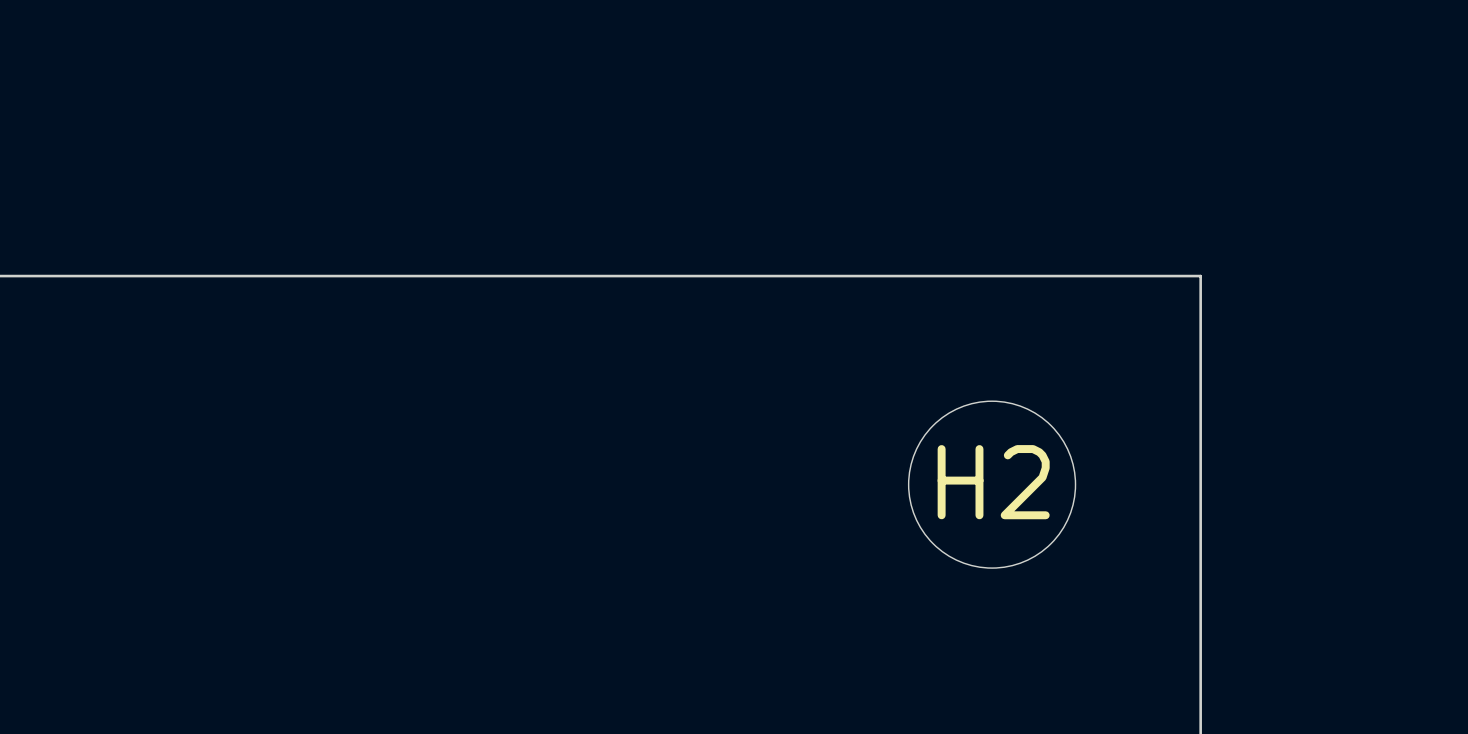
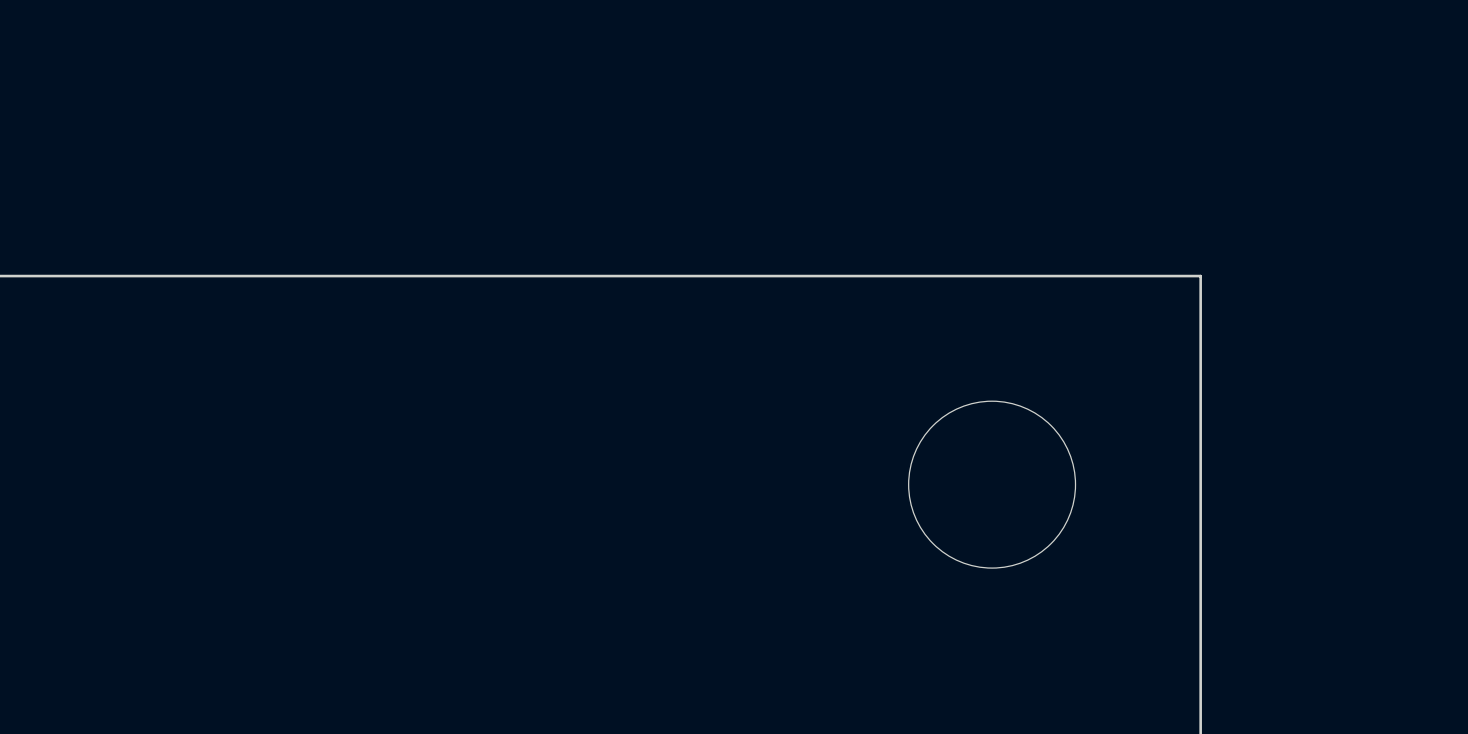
H2 name: H2 (993, 482) -> none

